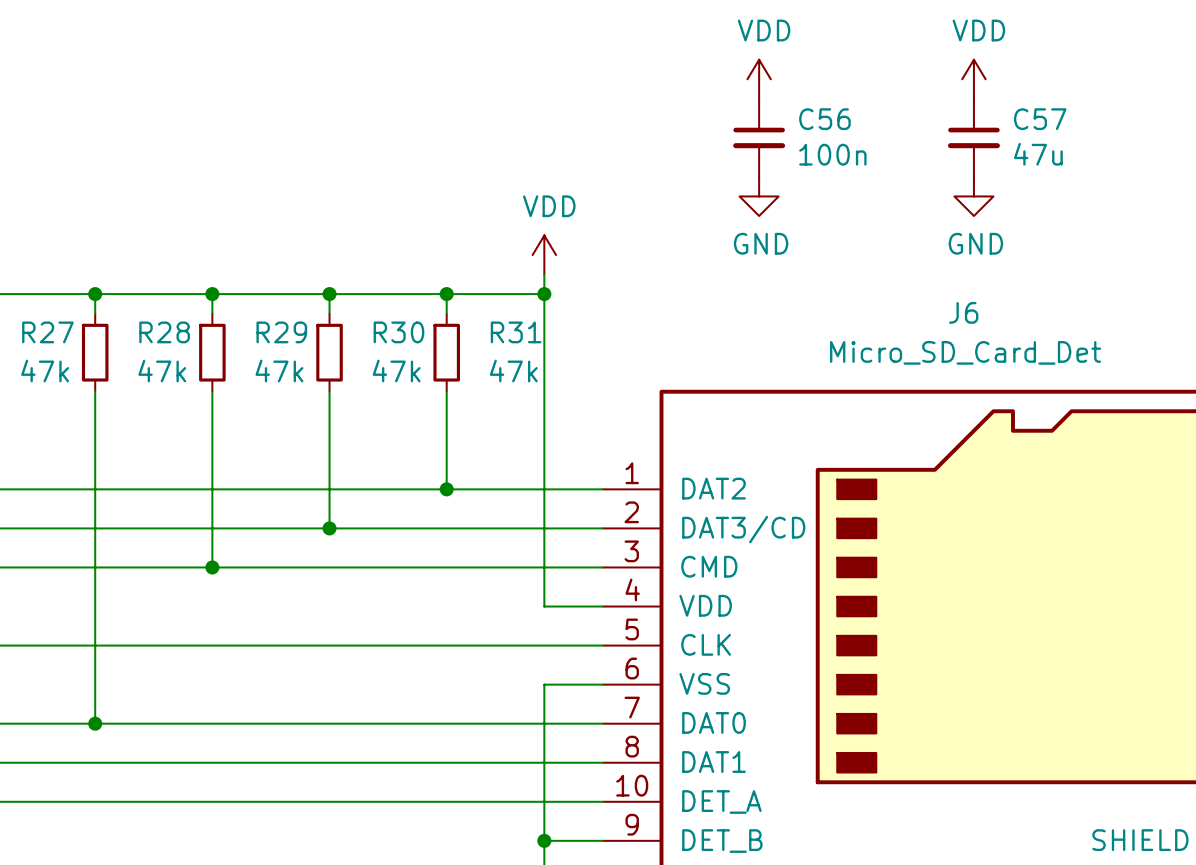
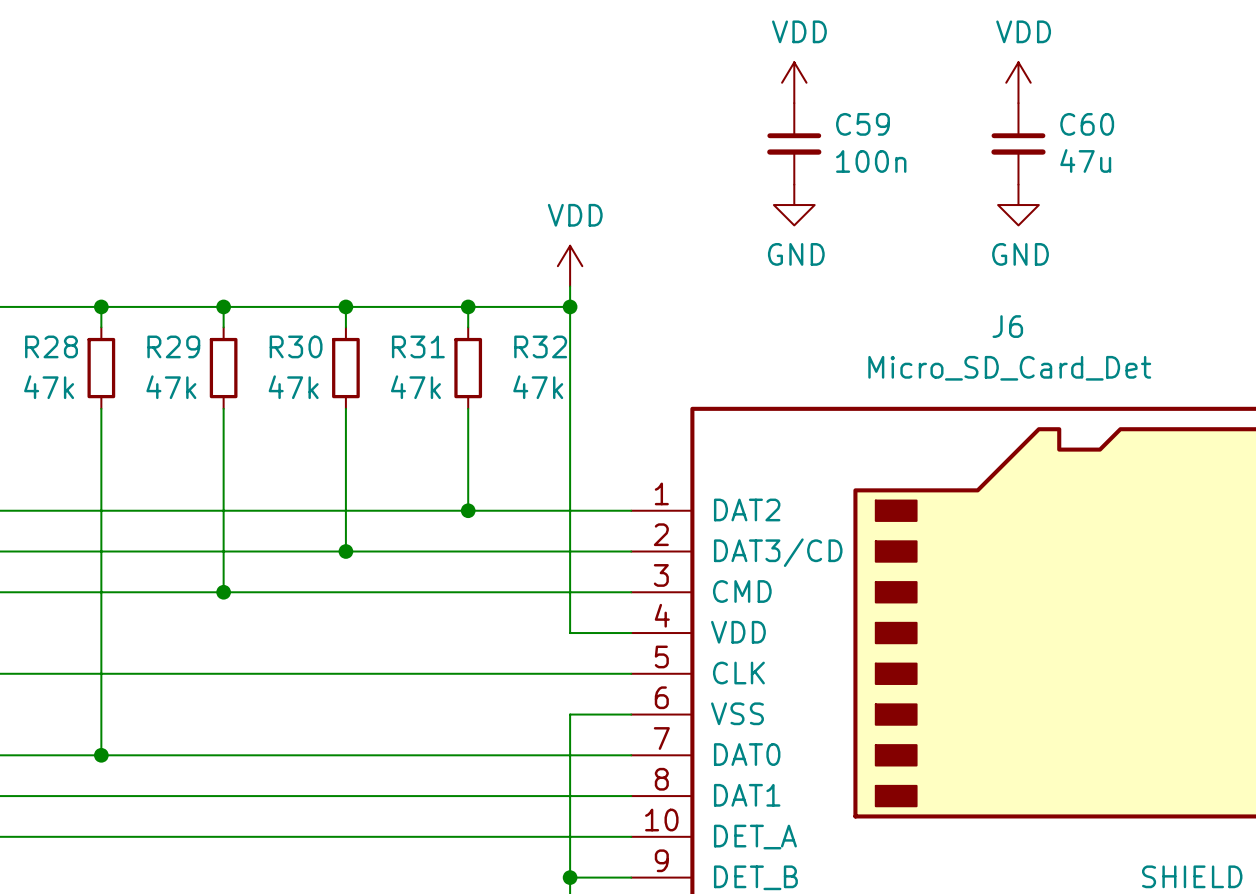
C56 name: C56 (824, 119) -> C59 (863, 124)
C57 name: C57 (1040, 119) -> C60 (1087, 124)
R27 name: R27 (47, 332) -> R28 (51, 346)
R28 name: R28 (164, 332) -> R29 (173, 346)
R29 name: R29 (281, 332) -> R30 (296, 346)
R30 name: R30 (398, 332) -> R31 (418, 346)
R31 name: R31 (516, 332) -> R32 (540, 346)

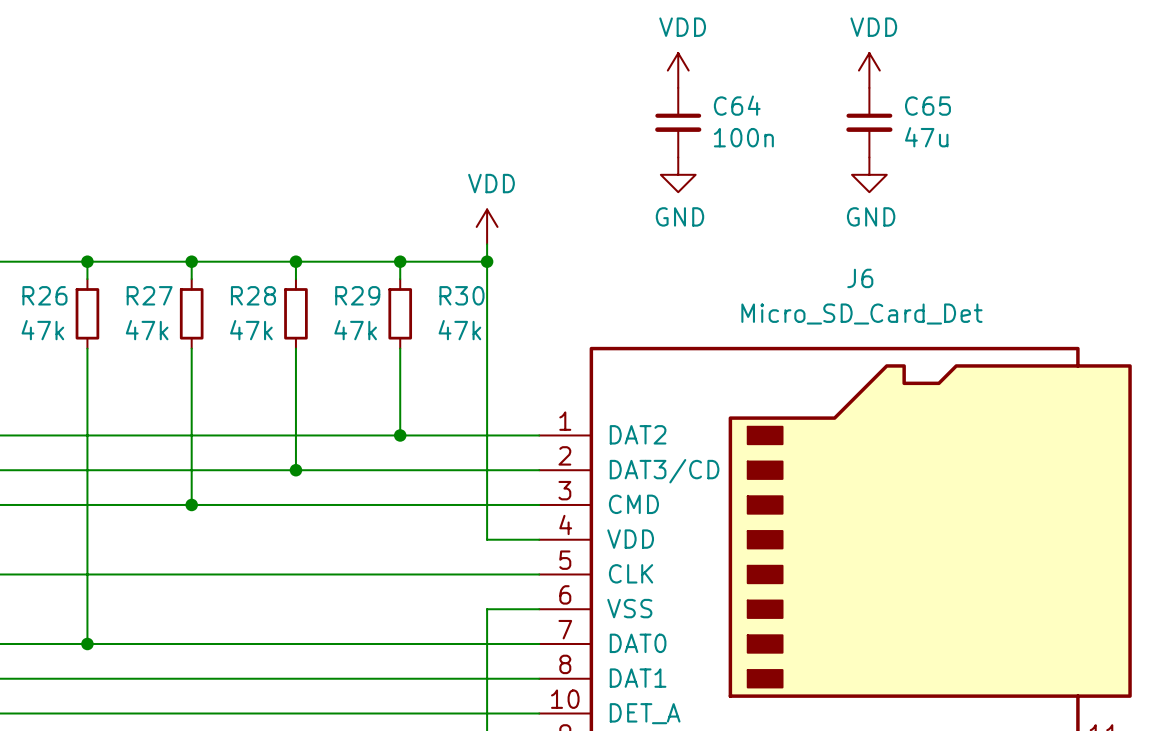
C59 name: C59 (863, 124) -> C64 (737, 105)
C60 name: C60 (1087, 124) -> C65 (927, 106)
R28 name: R28 (51, 346) -> R26 (44, 295)
R29 name: R29 (173, 346) -> R27 (149, 295)
R30 name: R30 (296, 346) -> R28 (253, 295)
R31 name: R31 (418, 346) -> R29 (357, 295)
R32 name: R32 (540, 346) -> R30 (461, 295)

